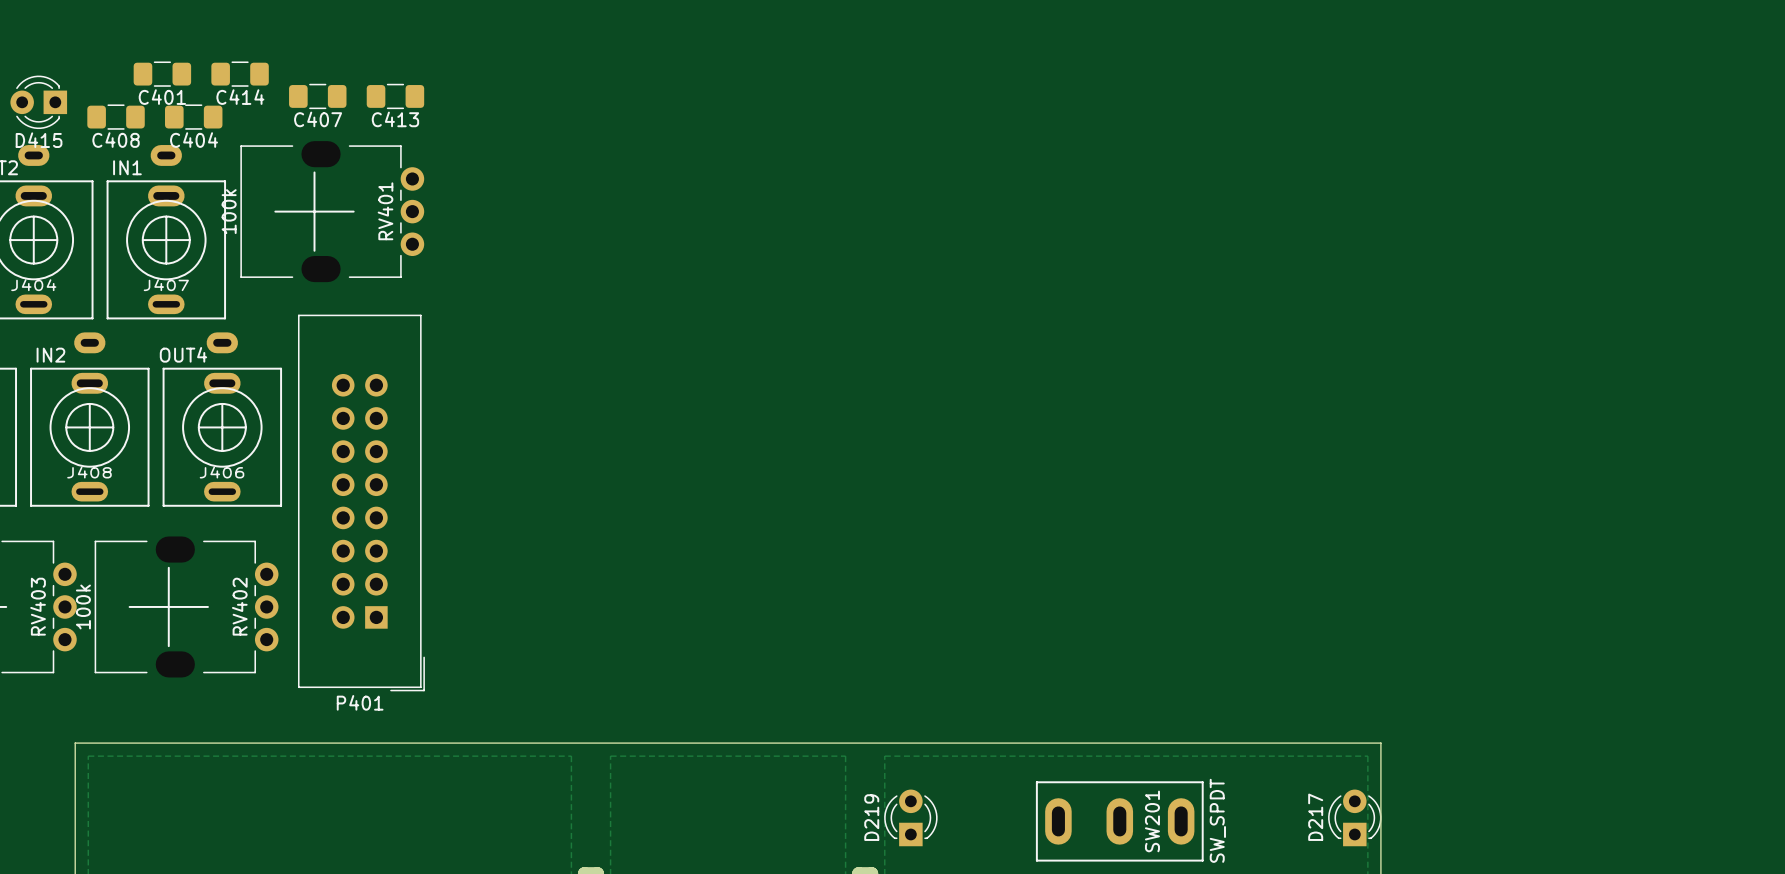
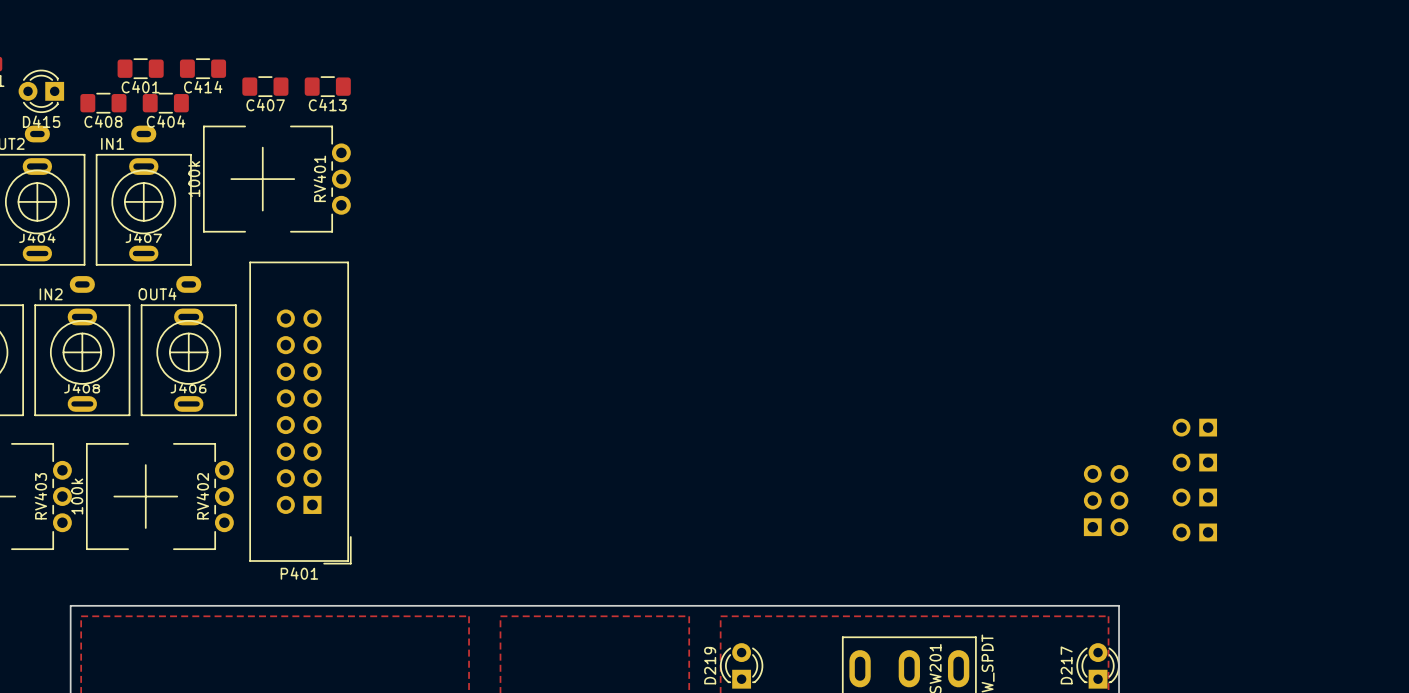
part: none -> (1194, 427)
part: none -> (1194, 462)
part: none -> (1194, 497)
part: none -> (1106, 500)
part: none -> (1194, 532)

